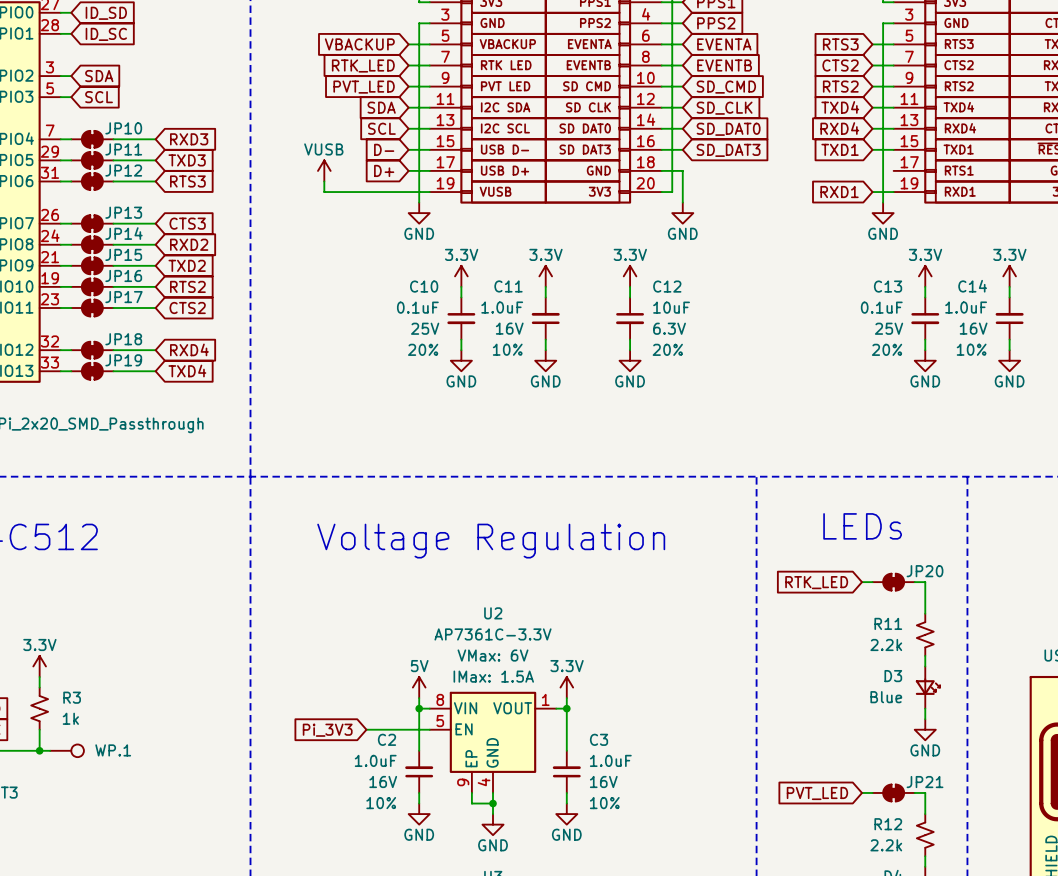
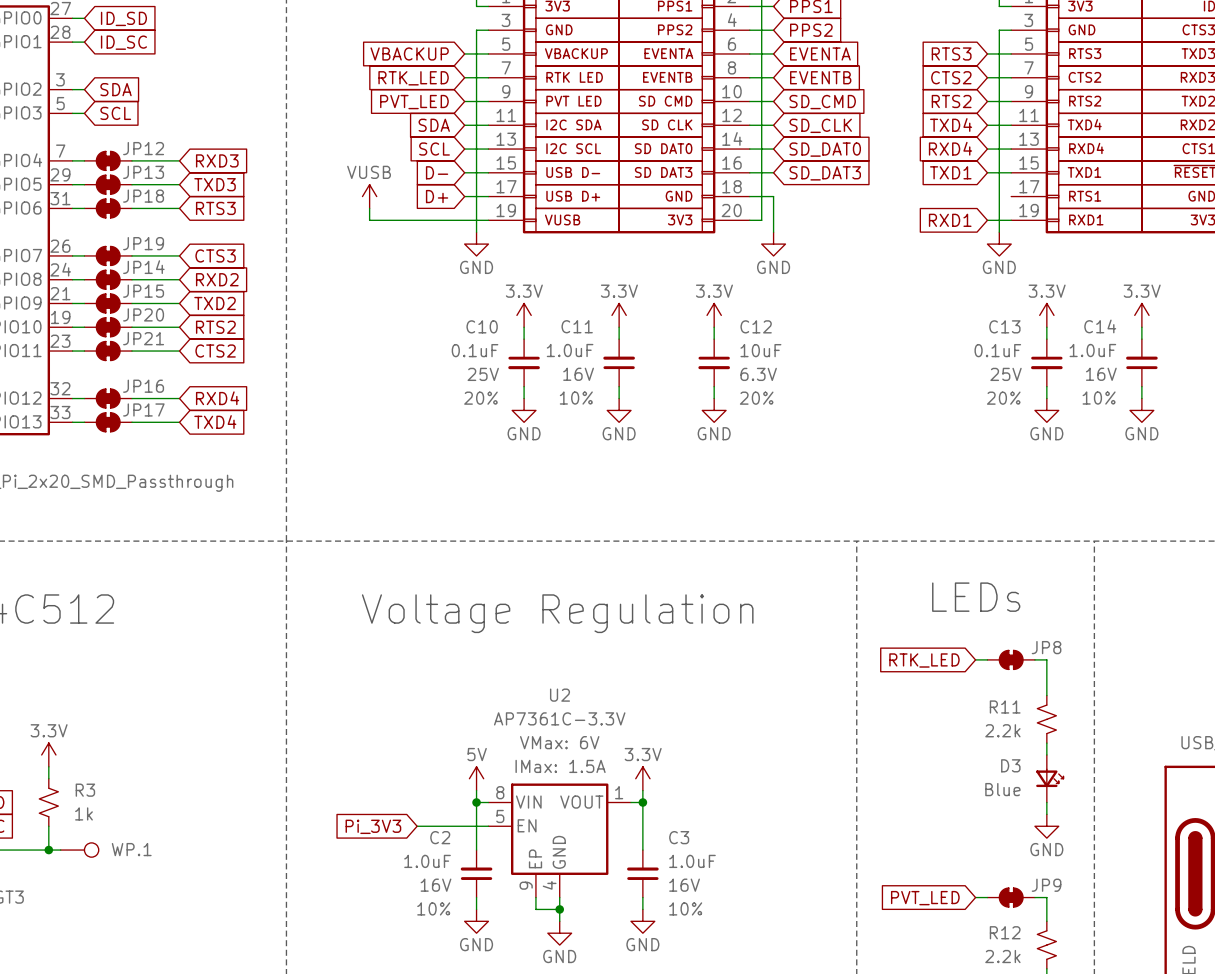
JP10 name: JP10 (123, 128) -> JP12 (143, 148)
JP11 name: JP11 (123, 149) -> JP13 (143, 172)
JP12 name: JP12 (123, 170) -> JP18 (143, 196)
JP13 name: JP13 (123, 212) -> JP19 (143, 243)
JP16 name: JP16 (123, 275) -> JP20 (143, 314)
JP17 name: JP17 (123, 297) -> JP21 (143, 338)
JP18 name: JP18 (123, 339) -> JP16 (143, 386)
JP19 name: JP19 (123, 360) -> JP17 (143, 409)
JP20 name: JP20 (925, 571) -> JP8 (1046, 647)
JP21 name: JP21 (925, 782) -> JP9 (1046, 885)

